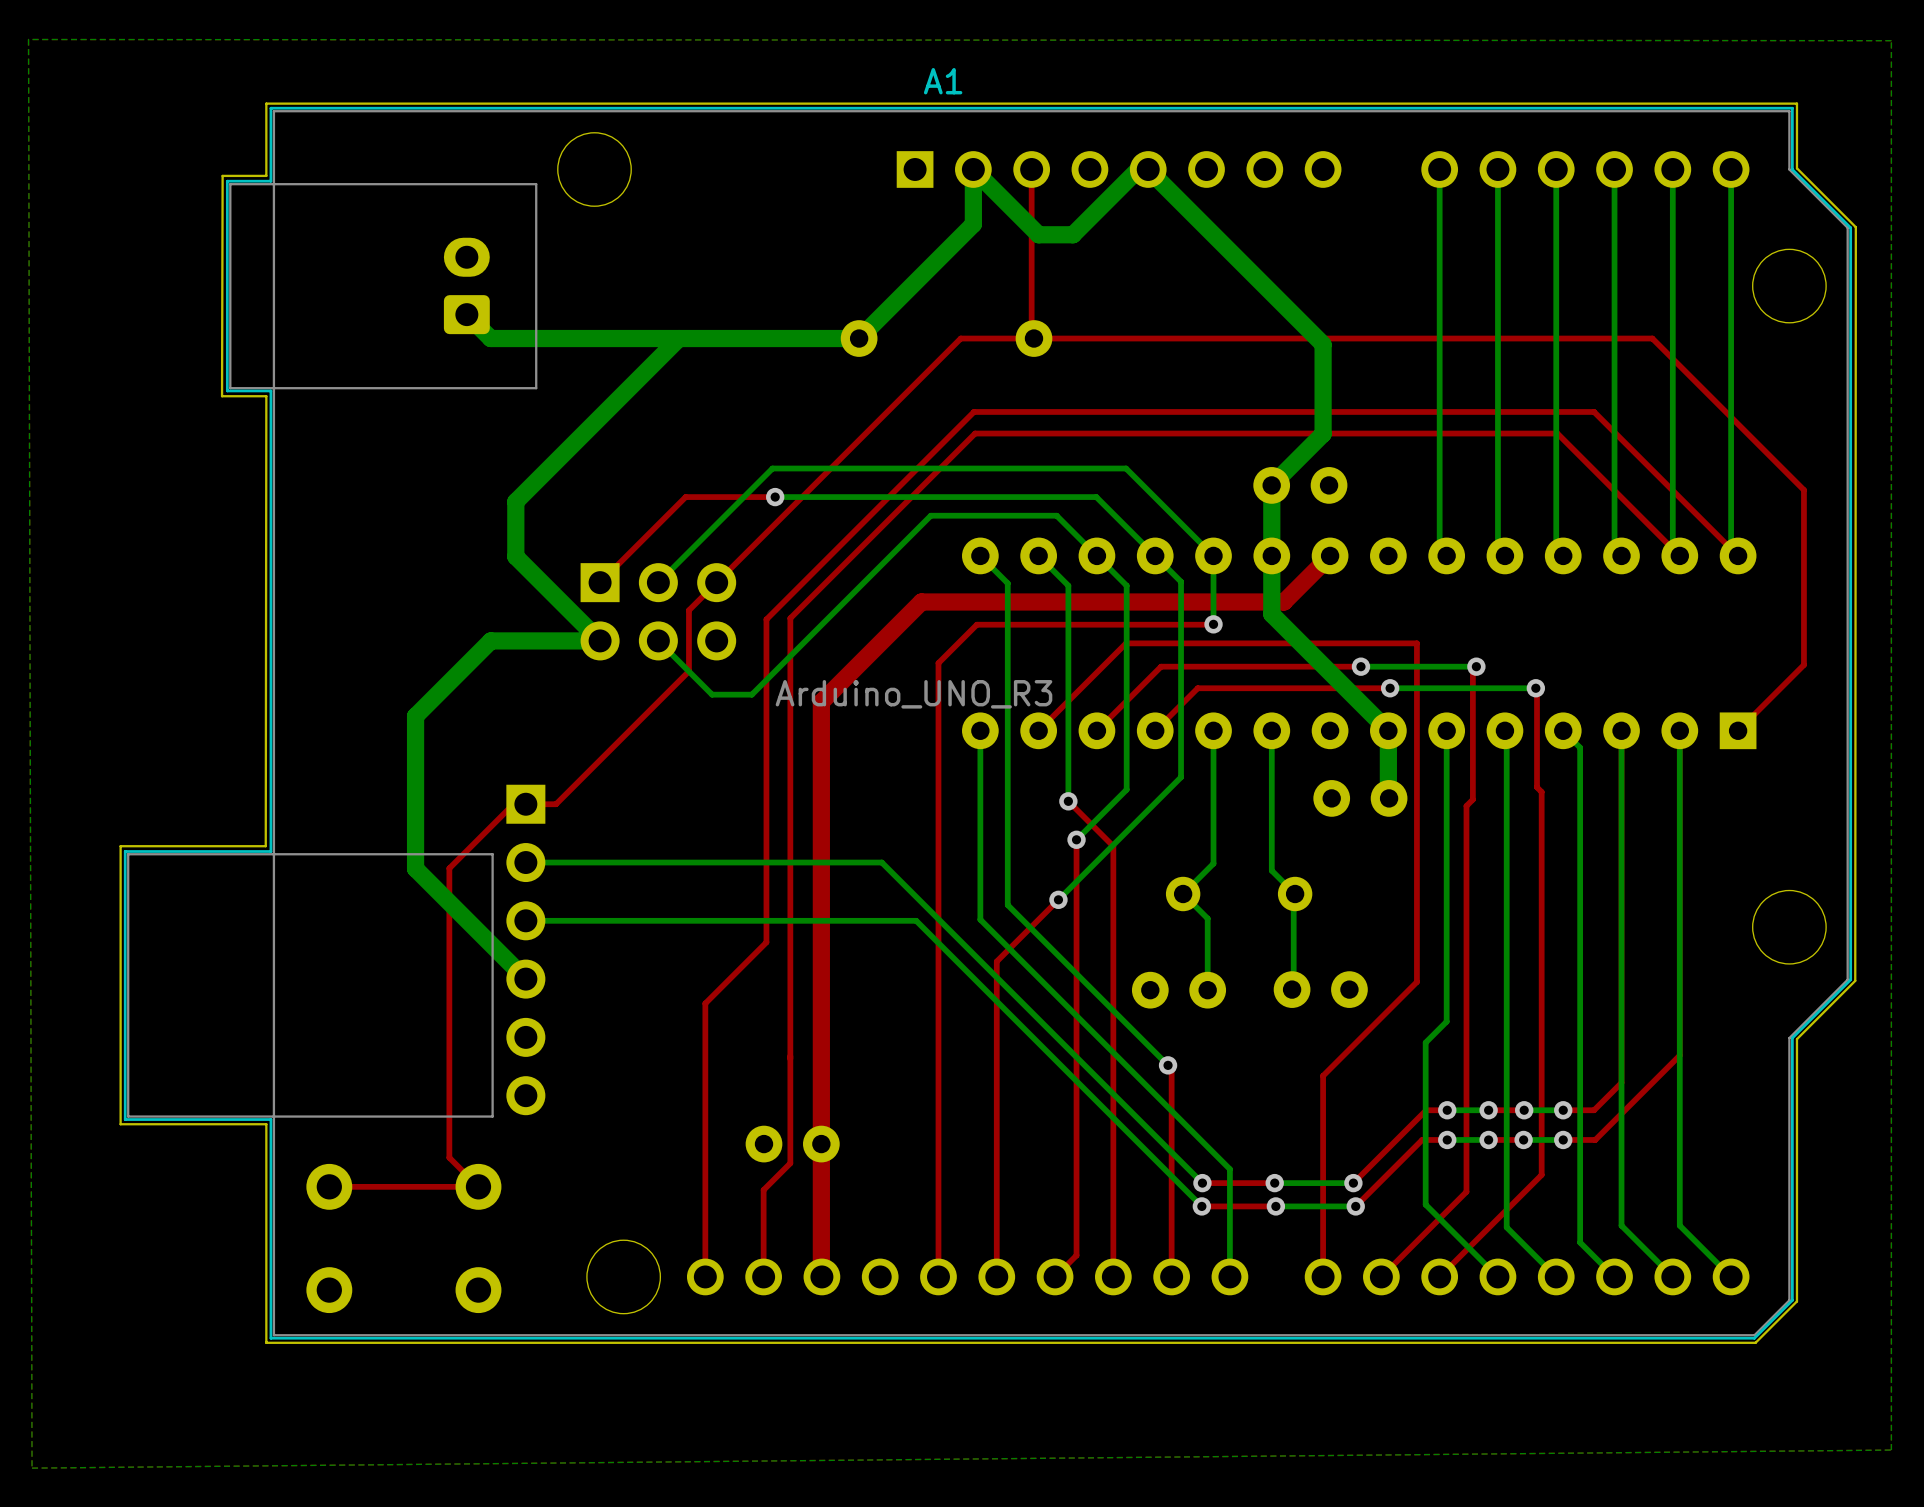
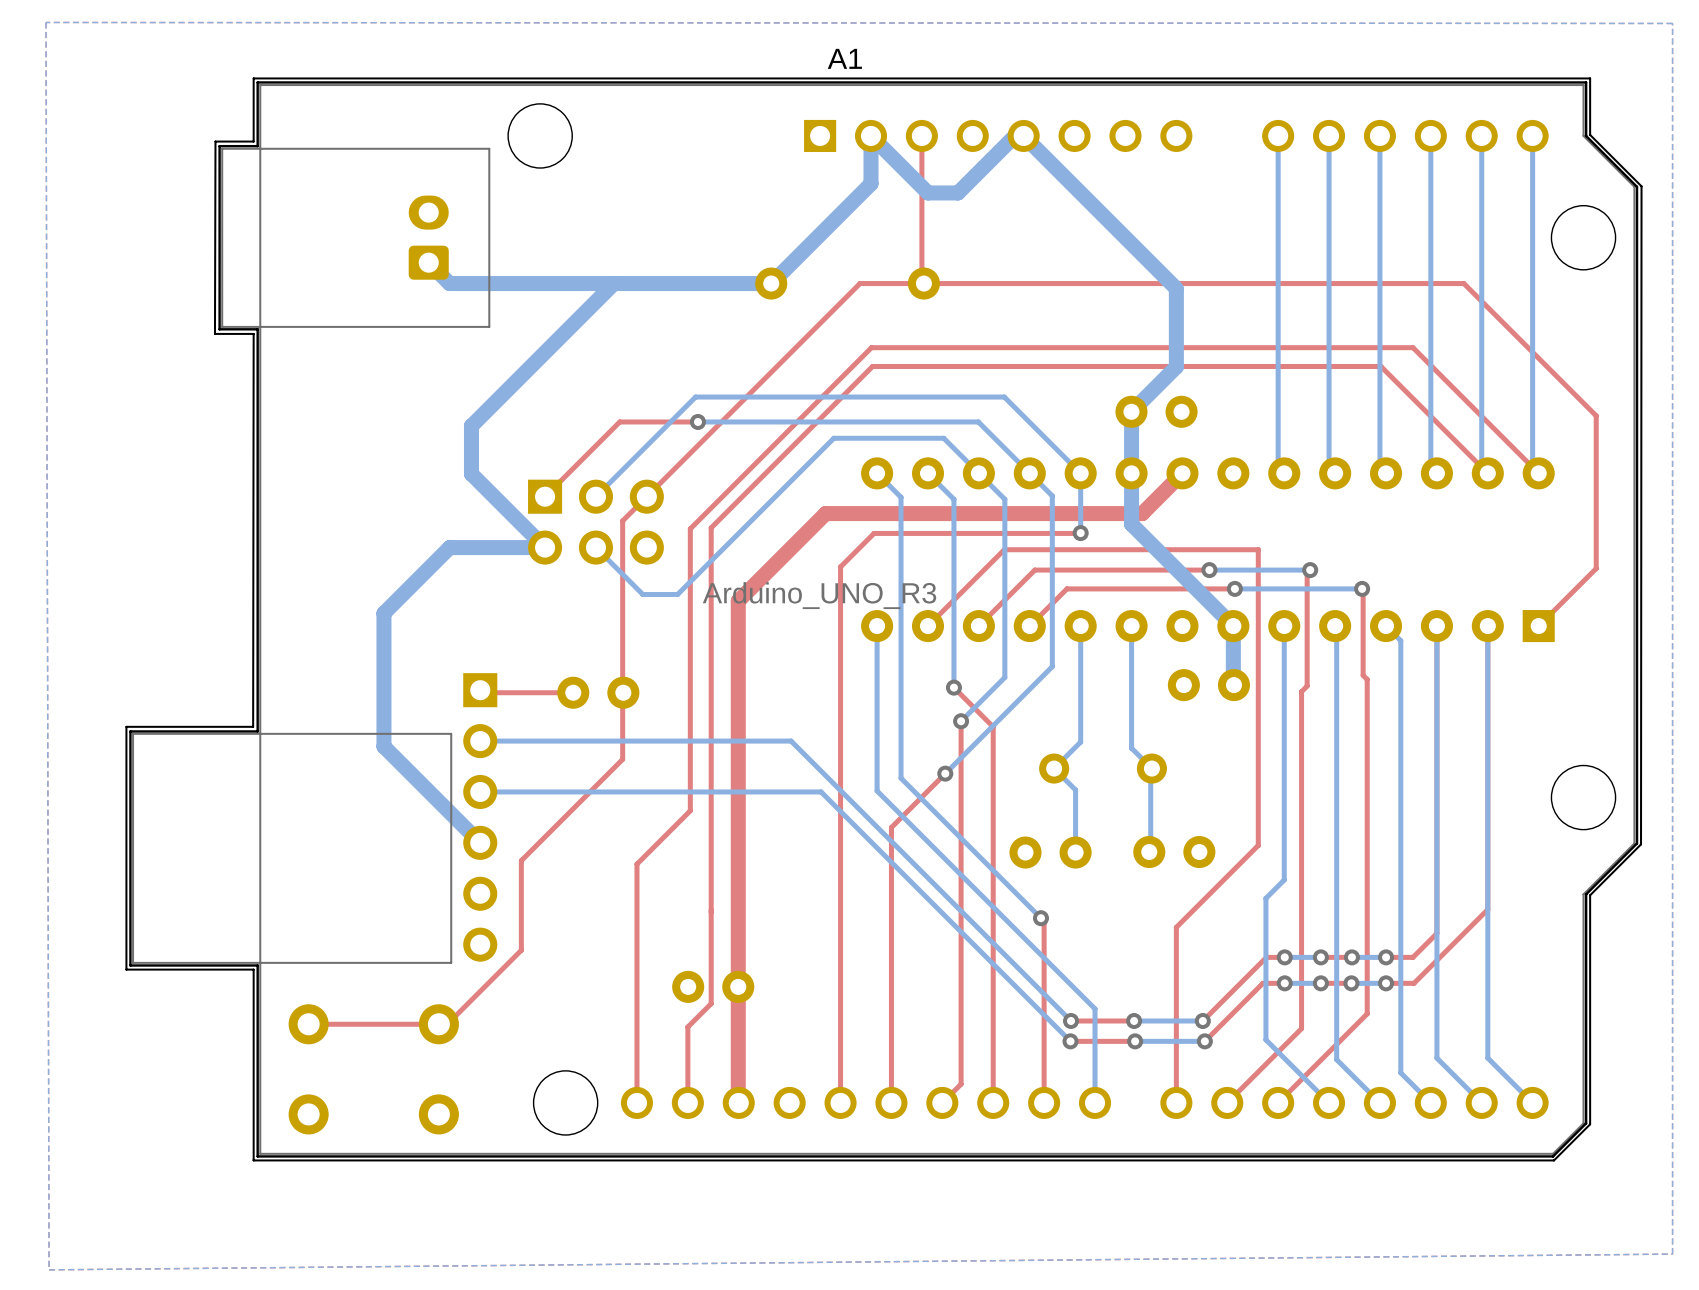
top track: (688, 671) (556, 804) (513, 804) (449, 868) (449, 1157) (478, 1186) -> (622, 574) (622, 759) (521, 860) (521, 950) (447, 1024) (438, 1024)
top track: none -> (480, 690) (482, 692) (573, 692)
part: none -> (598, 692)

